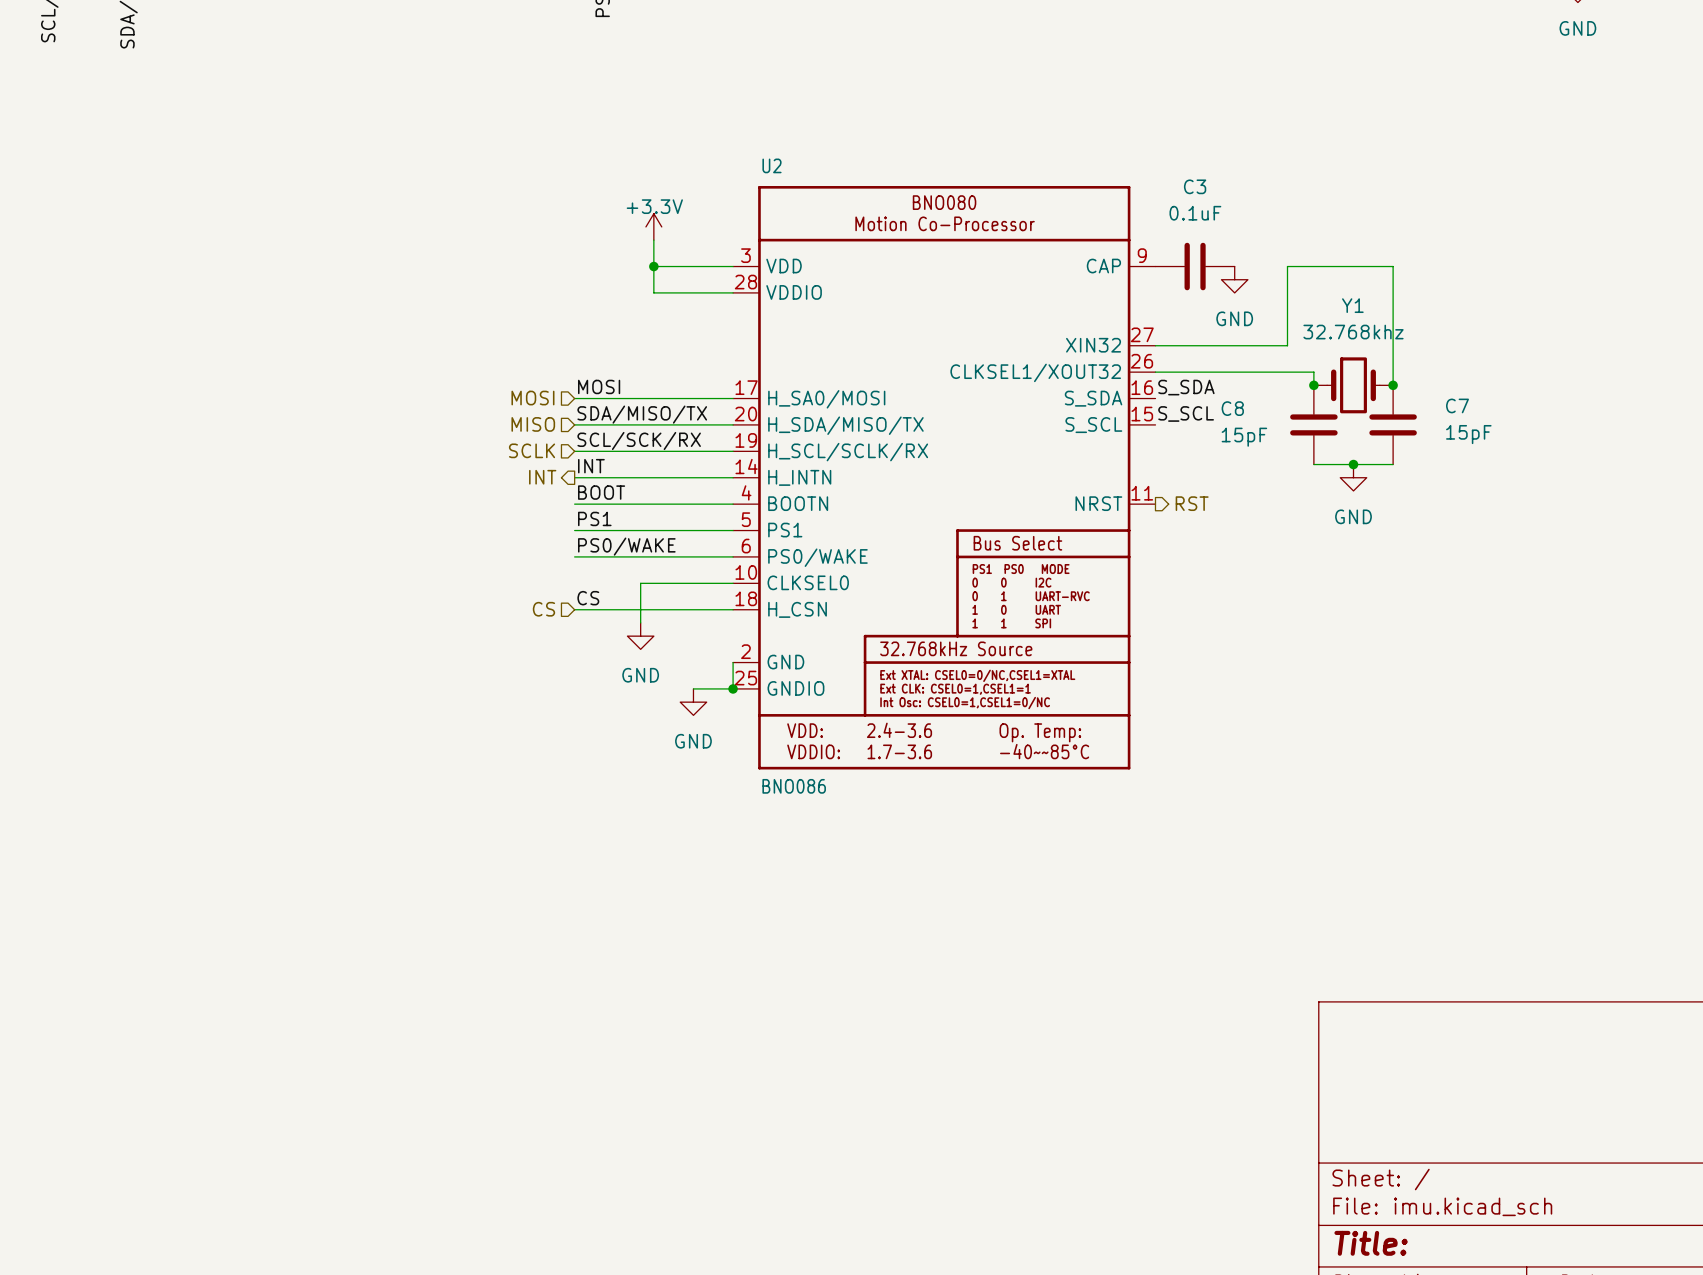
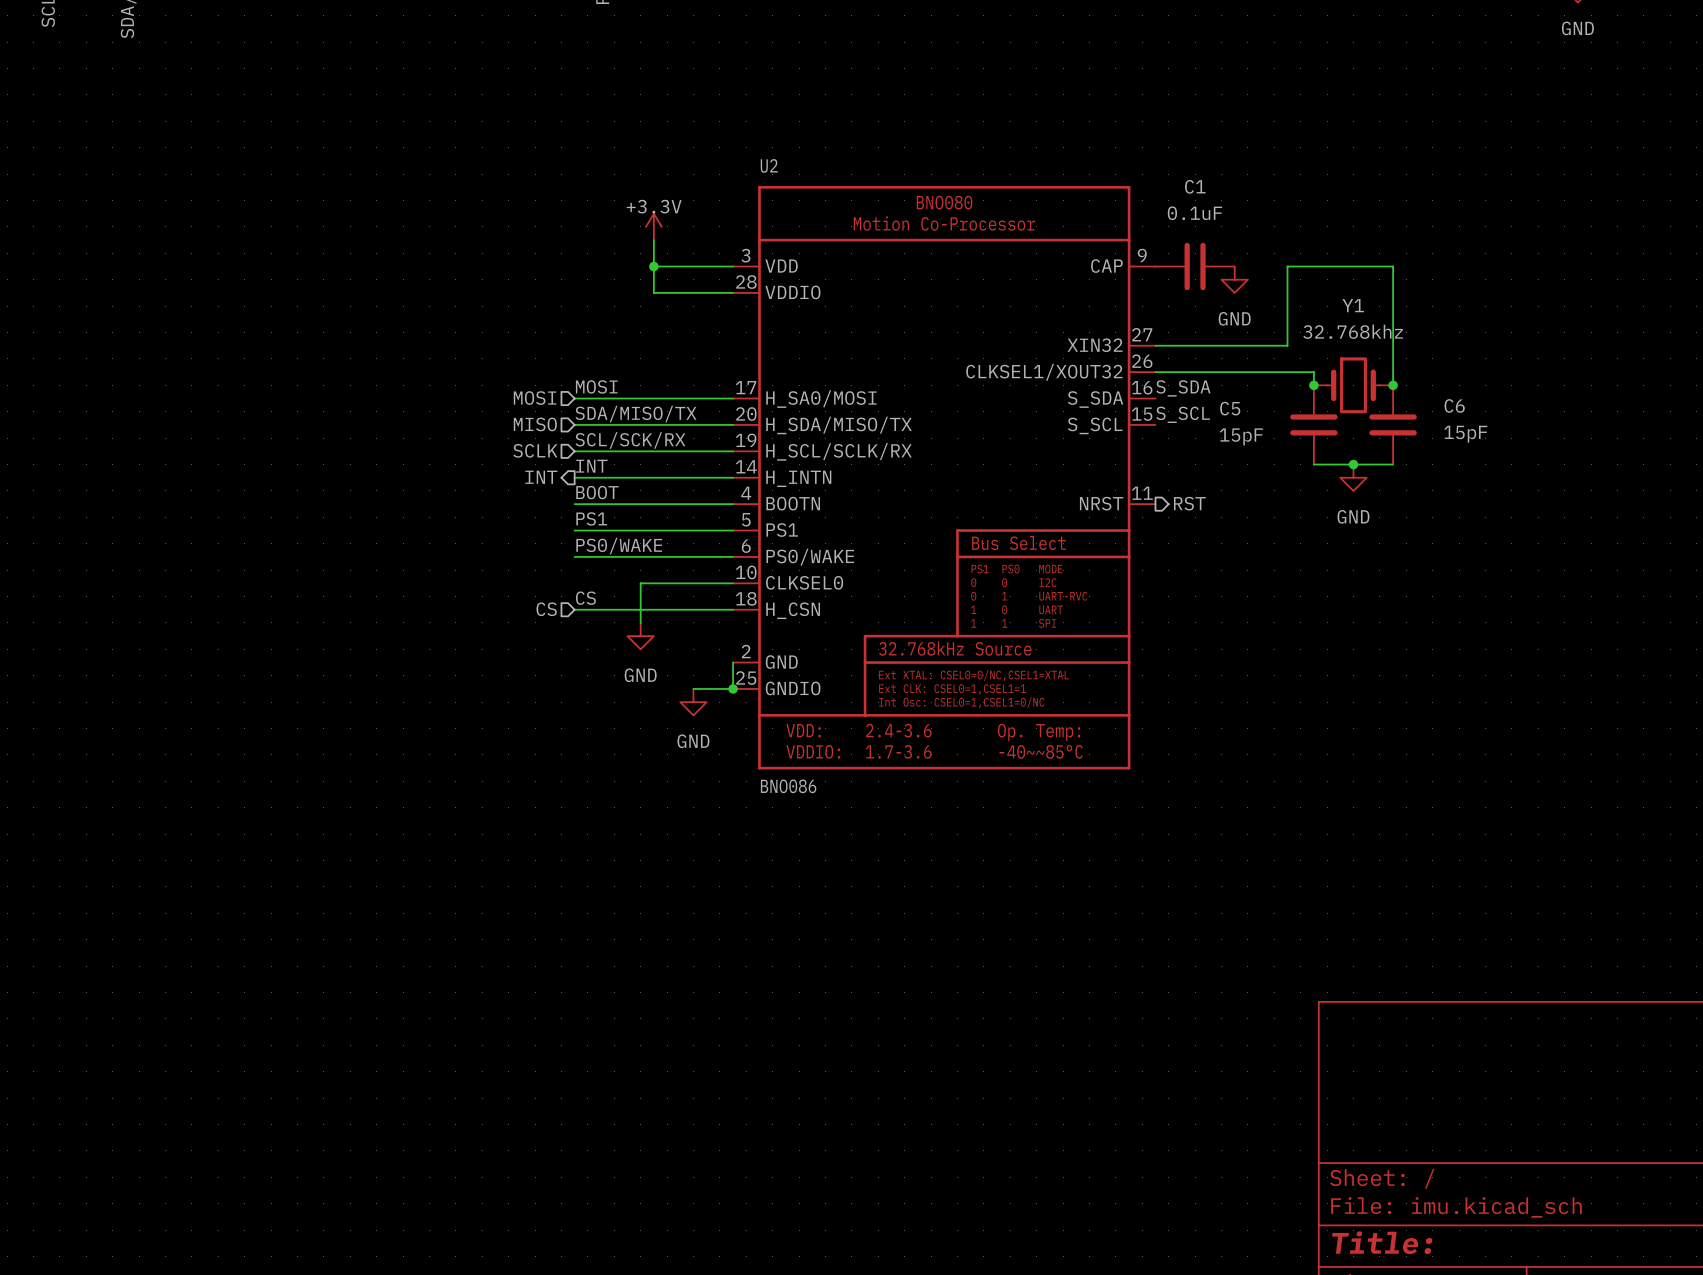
C3 name: C3 (1195, 186) -> C1 (1195, 186)
C7 name: C7 (1457, 405) -> C6 (1454, 405)
C8 name: C8 (1232, 408) -> C5 (1230, 408)

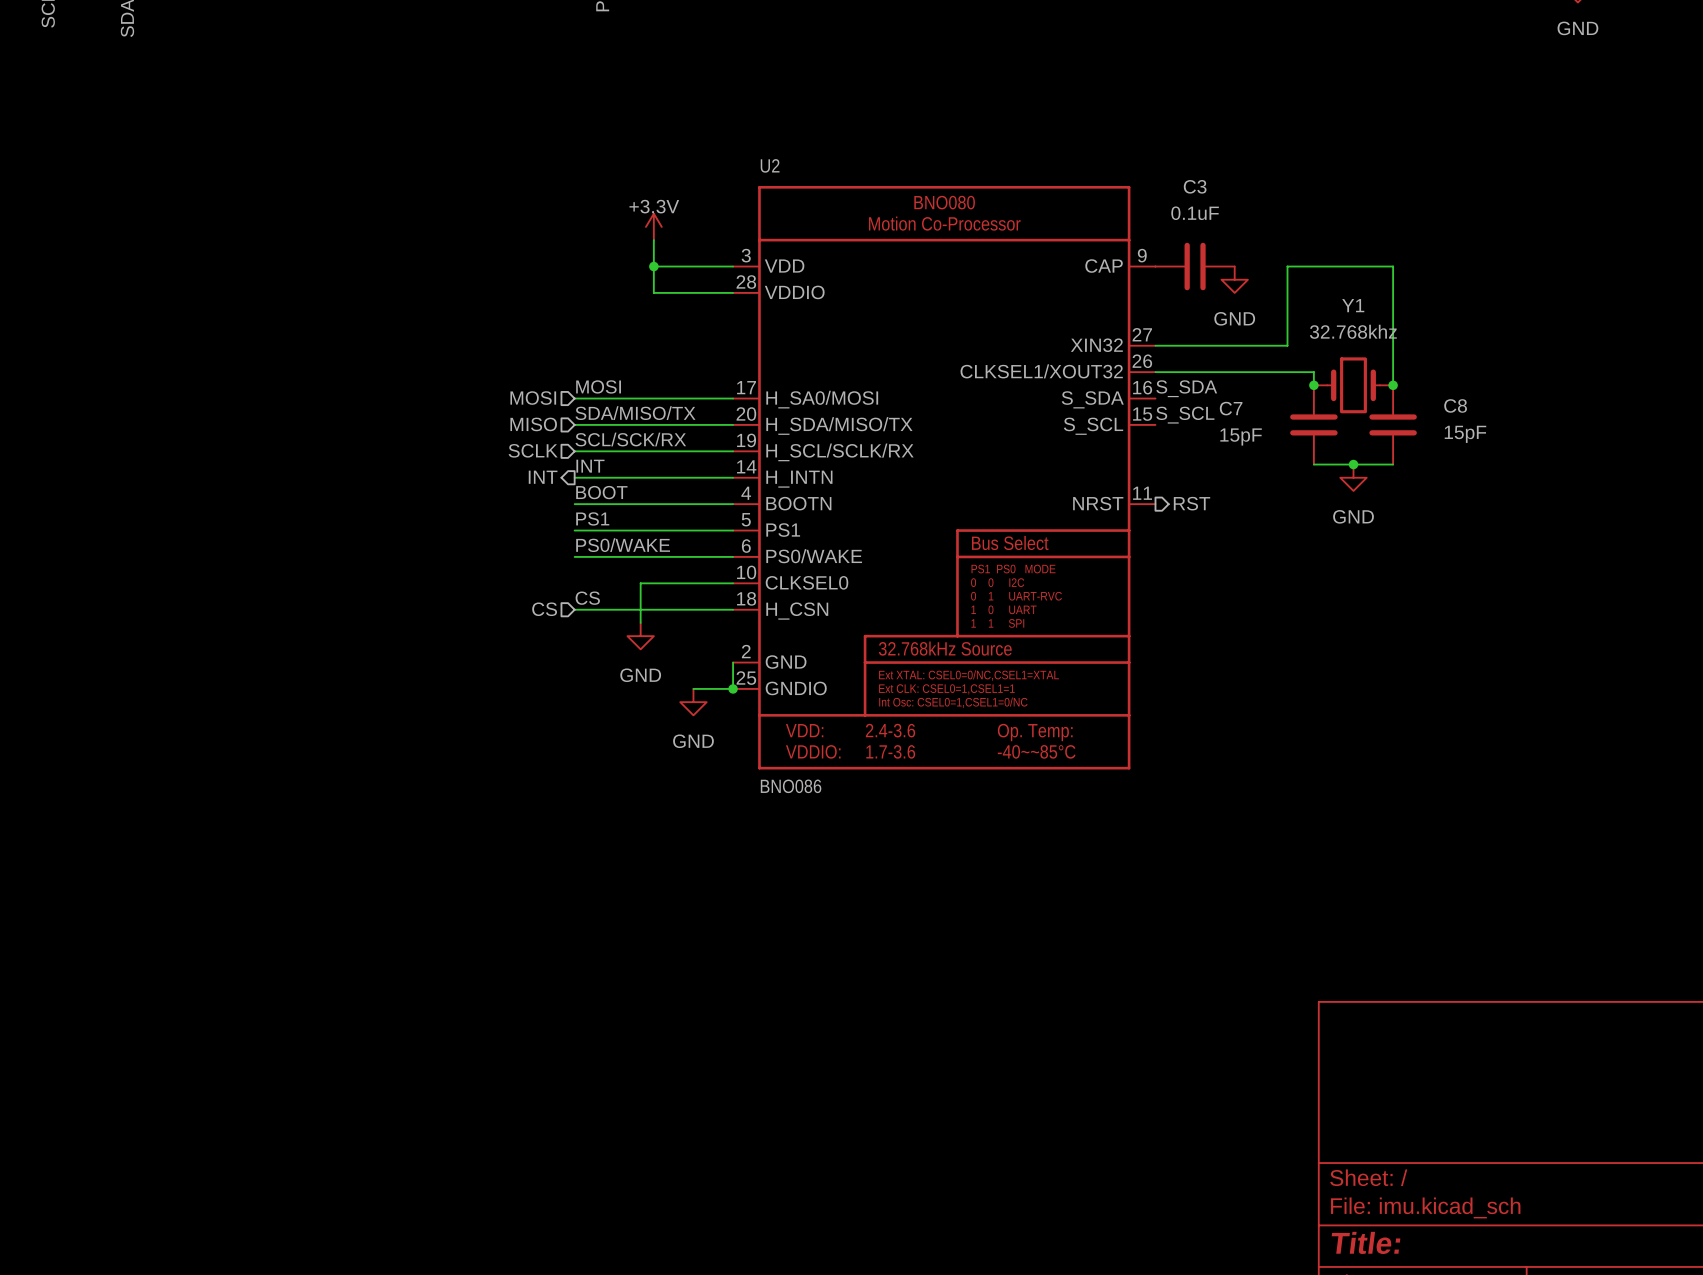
C1 name: C1 (1195, 186) -> C3 (1195, 186)
C6 name: C6 (1454, 405) -> C8 (1455, 405)
C5 name: C5 (1230, 408) -> C7 (1231, 408)

